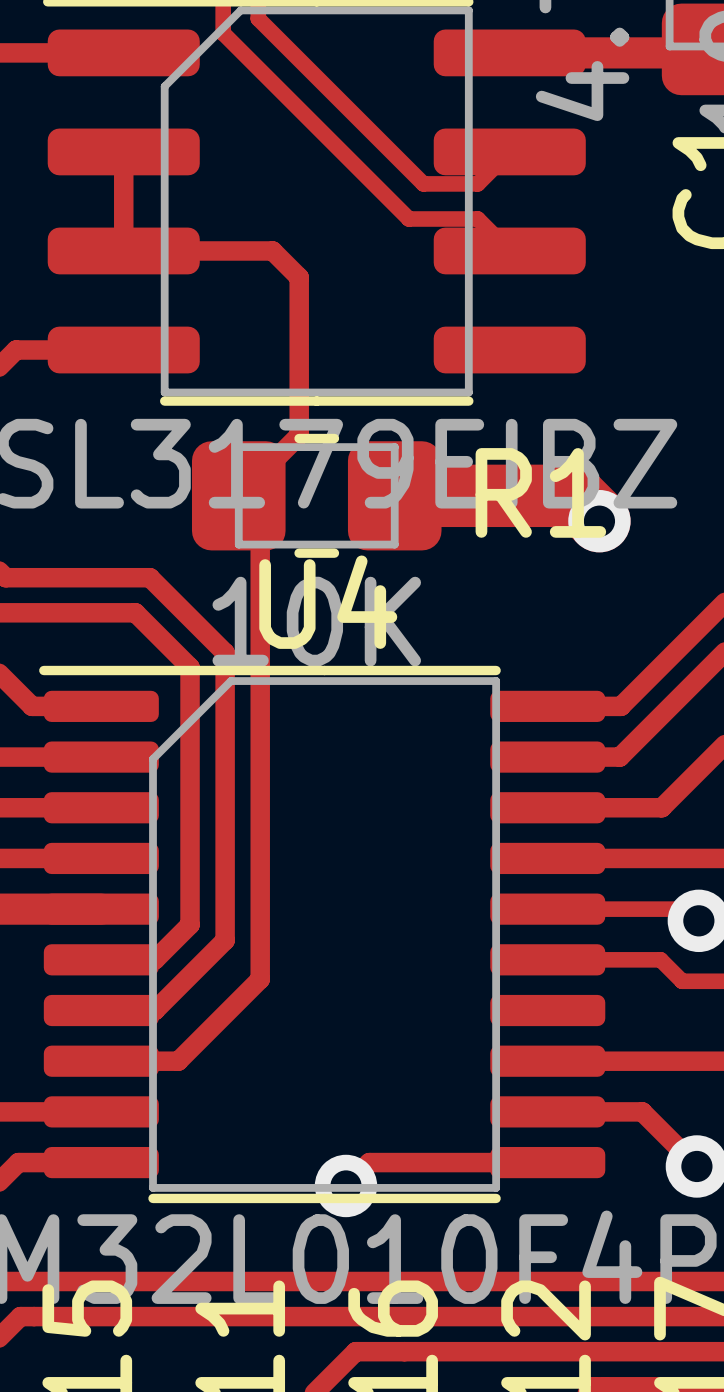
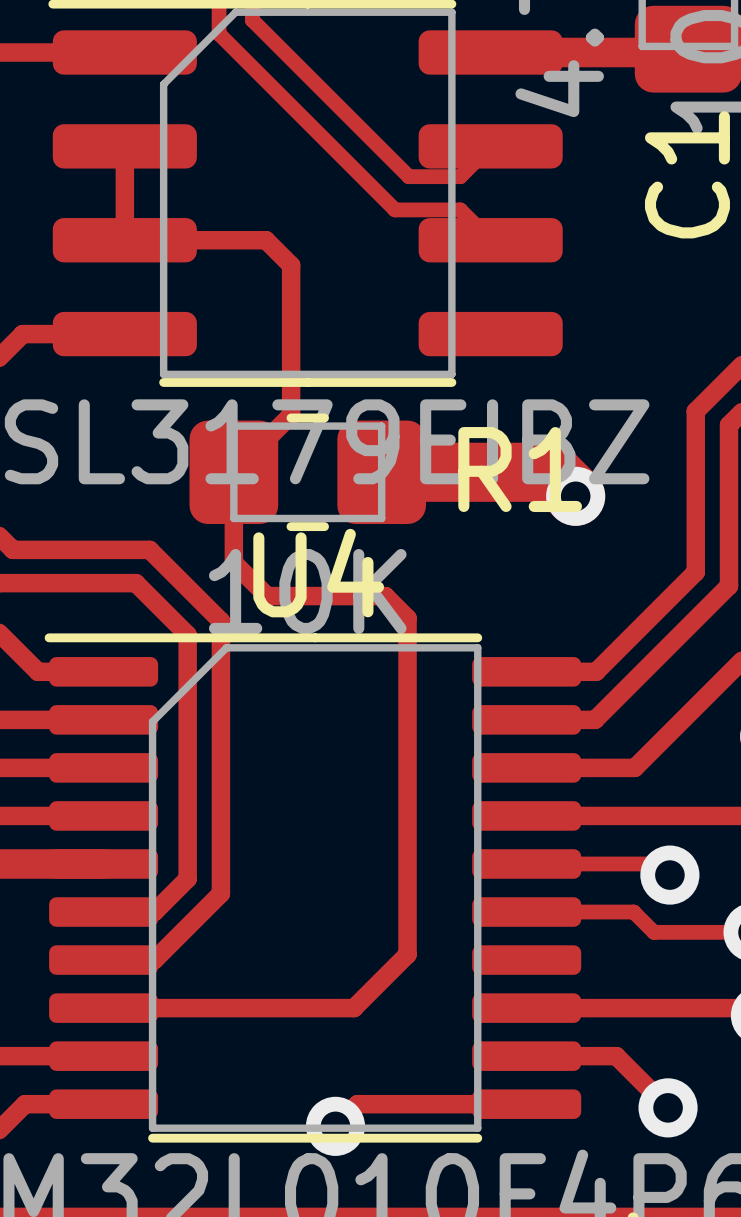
track: (238, 495) (260, 517) (260, 979) (178, 1061) -> (233, 472) (233, 562) (267, 596) (385, 596) (407, 618) (407, 954) (353, 1008) (176, 1008)

